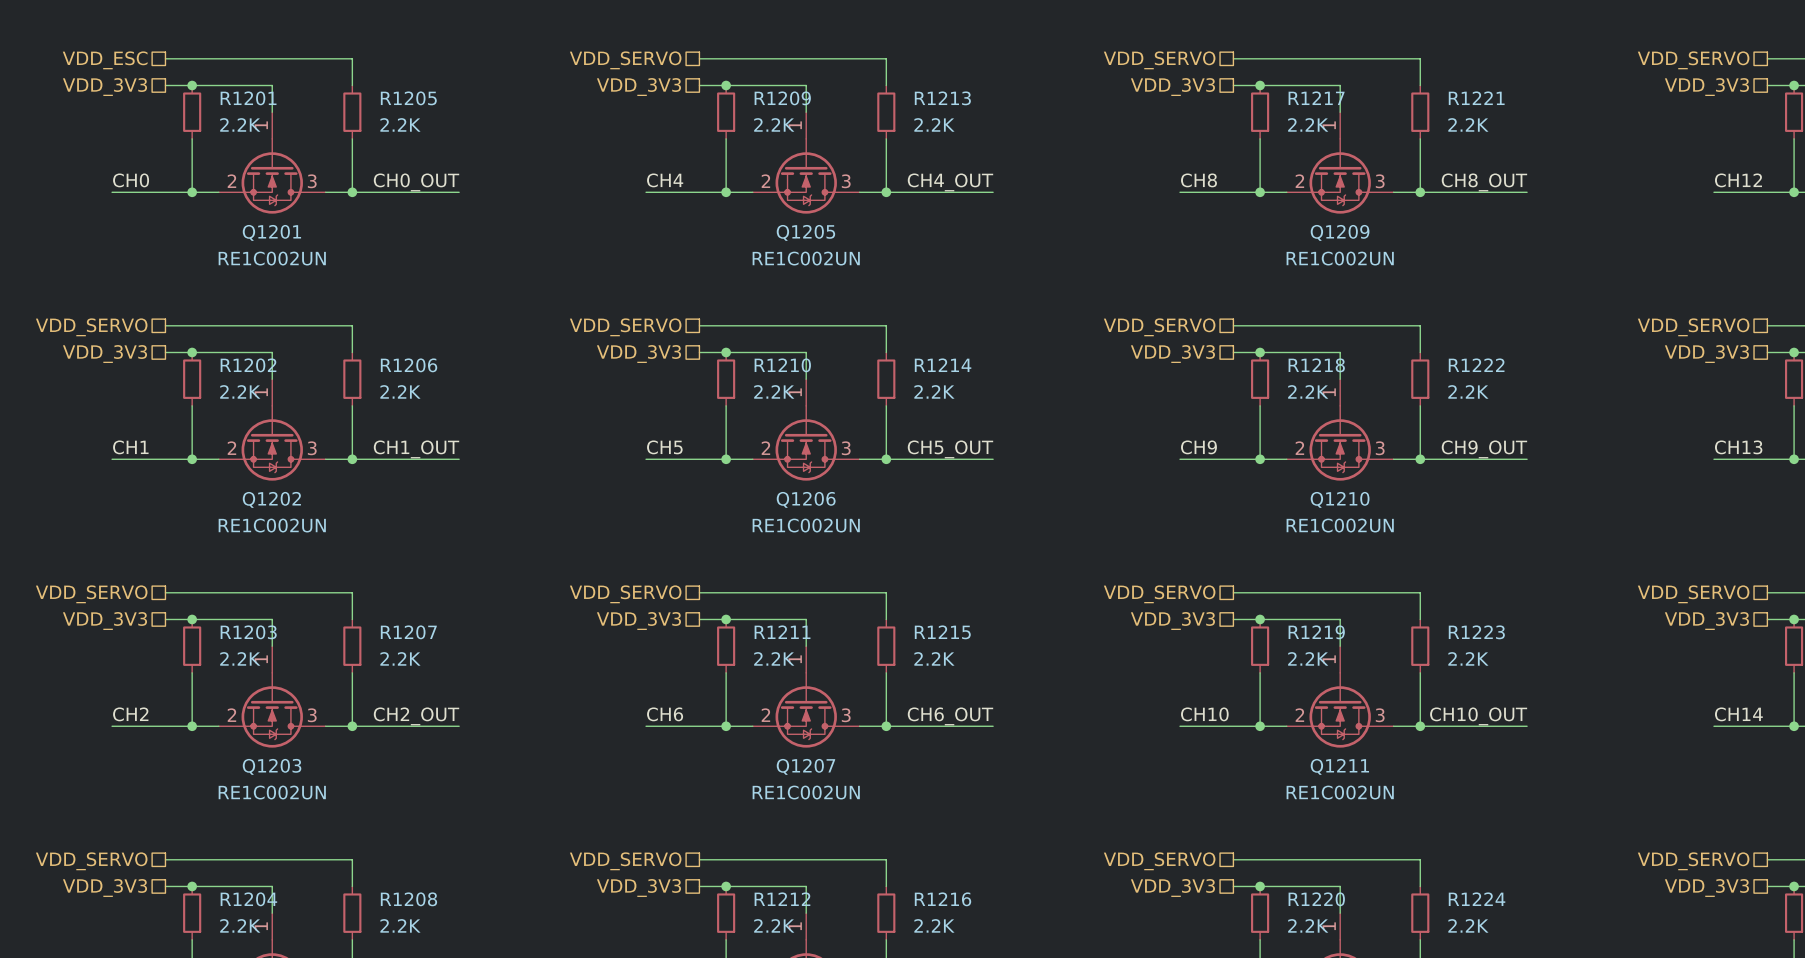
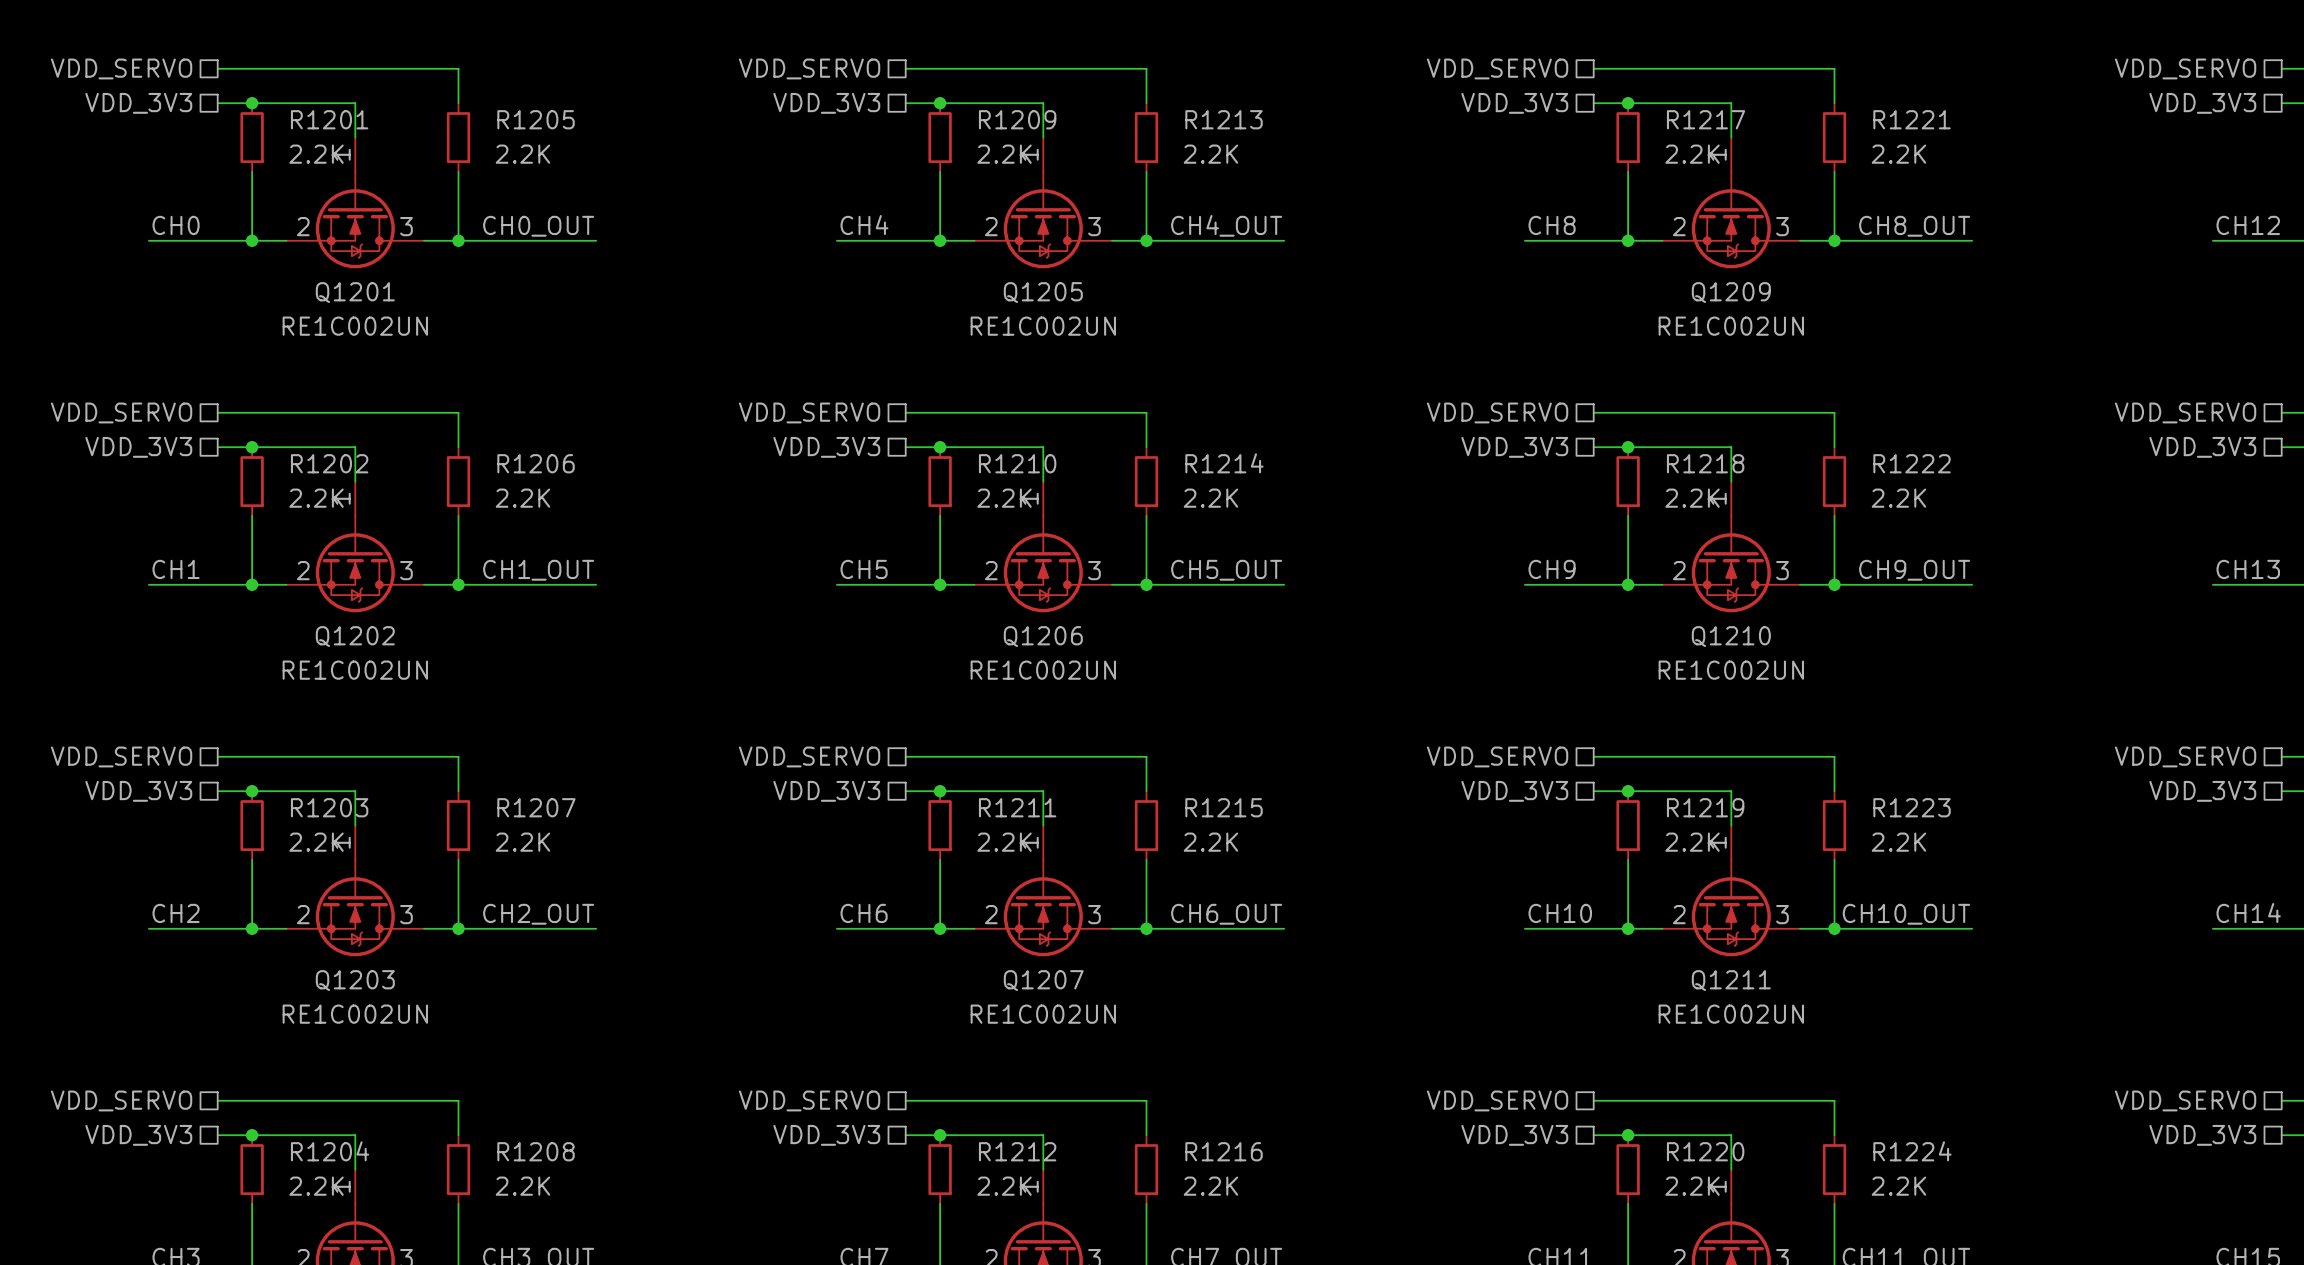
hierarchical label: VDD_ESC (105, 60) -> VDD_SERVO (121, 68)

